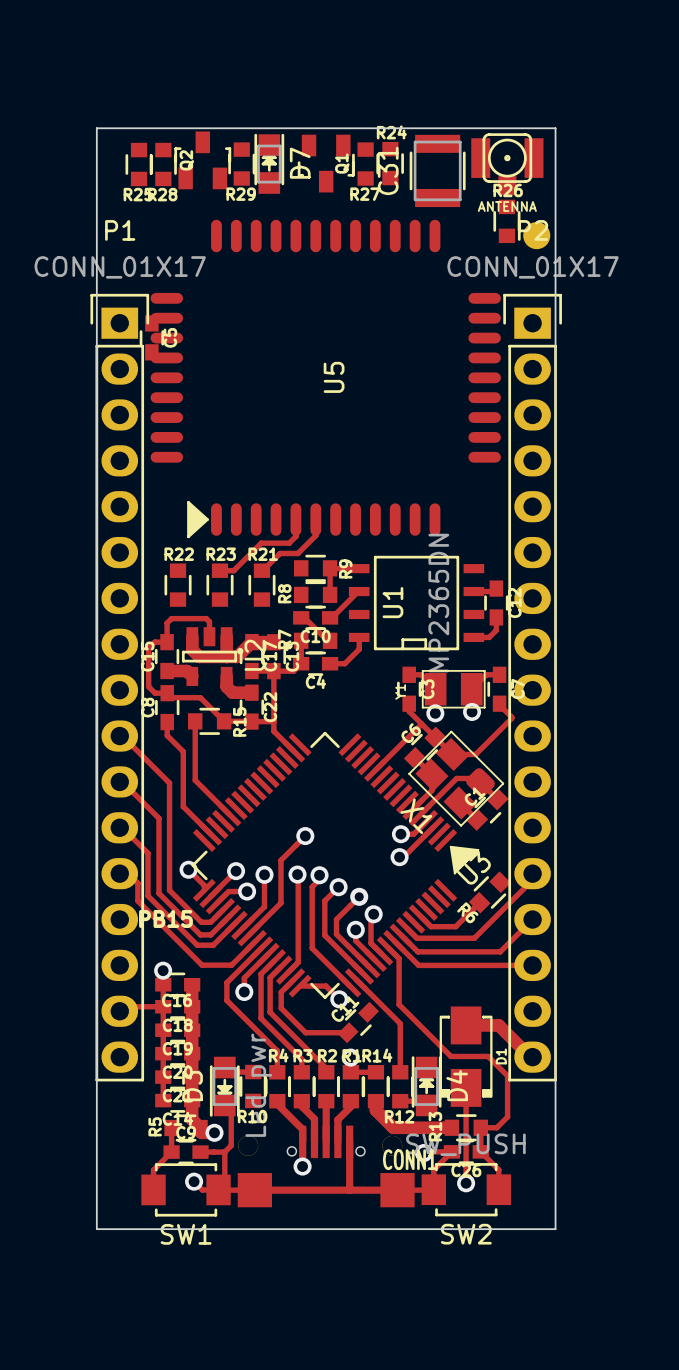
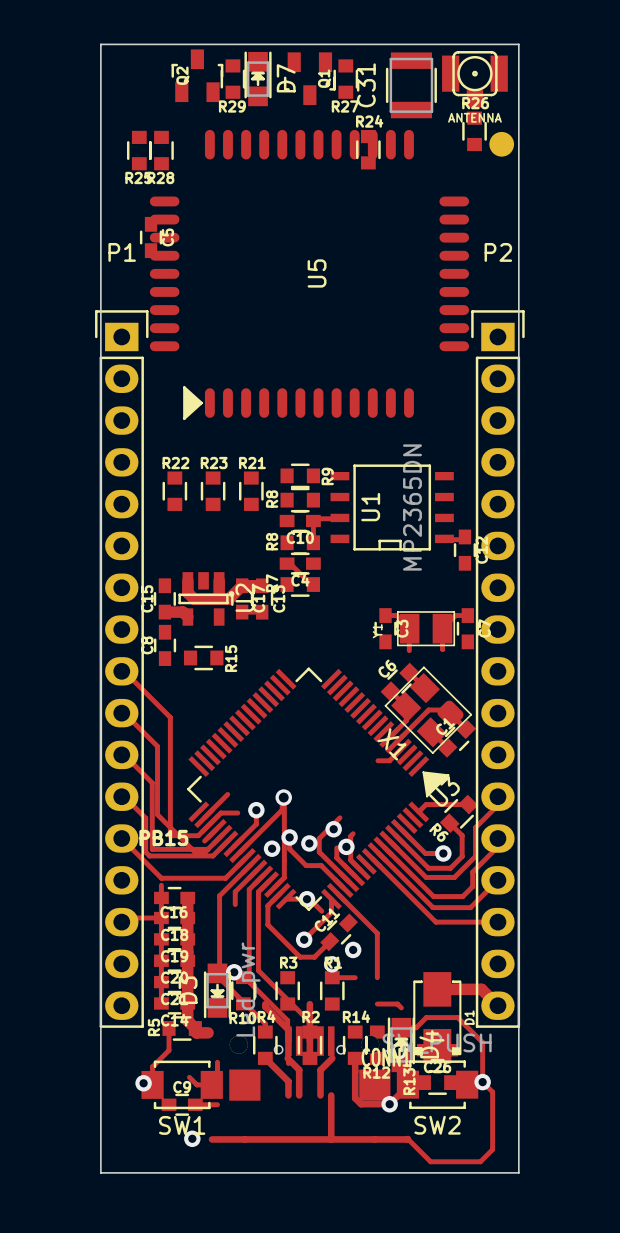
board edge: (96, 128) (555, 128) -> (100, 117) (100, 44) (518, 44) (518, 117)
Q2 position: (202, 160) -> (197, 75)
D7 position: (269, 163) -> (258, 78)
Q1 position: (326, 163) -> (309, 78)
R29 position: (241, 164) -> (232, 79)
R27 position: (365, 164) -> (345, 79)
part position: (507, 164) -> (474, 79)
C31 position: (437, 170) -> (411, 85)
R26 position: (506, 221) -> (474, 131)
part position: (536, 235) -> (501, 144)
P1 value: CONN_01X17 (120, 267) -> none
P2 value: CONN_01X17 (533, 267) -> none
C5 position: (151, 337) -> (151, 237)
U5 position: (325, 378) -> (309, 274)
track: (295, 519) (295, 536) (289, 543) (261, 543) (233, 570) (220, 570) -> none
track: (315, 519) (315, 535) (297, 553) (280, 553) (261, 570) -> none
R8: none -> (300, 500)
R9 position: (315, 568) -> (300, 475)
C10: none -> (300, 521)
R22 position: (178, 585) -> (174, 491)
R23 position: (220, 585) -> (213, 491)
R21 position: (261, 585) -> (251, 491)
track: (359, 591) (330, 617) -> none
U1 position: (416, 603) -> (392, 507)
track: (496, 617) (496, 630) (489, 637) (473, 637) -> none
track: (209, 636) (209, 621) (206, 618) (171, 618) (167, 623) (167, 642) (154, 642) (148, 648) (148, 686) (155, 693) (167, 693) (171, 697) (200, 697) (224, 721) (251, 721) -> none
C10 name: C10 (315, 636) -> C4 (300, 580)
track: (359, 637) (359, 649) (344, 663) (330, 663) -> none
track: (301, 640) (301, 663) (293, 671) (273, 671) (273, 731) (293, 751) -> none
C4: (315, 663) -> none
track: (226, 676) (226, 686) (232, 692) (251, 692) -> none
P1 position: (119, 687) -> (121, 669)
P2 position: (532, 687) -> (497, 669)
track: (499, 703) (511, 718) (475, 754) (452, 754) -> none
C22: (251, 707) -> none
via: (472, 711) -> none
via: (435, 713) -> none
track: (195, 721) (195, 780) (229, 814) -> none
track: (251, 721) (273, 721) -> none
track: (167, 722) (167, 735) (183, 751) (183, 806) (210, 834) -> none
track: (421, 724) (375, 770) -> none
track: (169, 783) (169, 890) (201, 922) (210, 922) -> (167, 714) (170, 717) (170, 835) (198, 835) (210, 823)
track: (432, 827) (403, 857) (399, 857) -> none
via: (400, 834) -> none
track: (305, 836) (281, 860) (281, 903) -> (282, 803) (282, 809) (268, 823)
via: (305, 836) -> none
track: (147, 853) (147, 895) (197, 945) (213, 945) (219, 938) -> (147, 778) (152, 782) (152, 849) (207, 849)
via: (399, 857) -> none
track: (188, 869) (204, 885) (204, 890) -> none
via: (188, 869) -> none
via: (236, 871) -> none
track: (122, 873) (128, 873) (137, 883) (137, 900) (202, 965) (231, 965) (233, 963) -> (124, 796) (145, 818) (145, 852) (149, 855) (212, 855)
track: (264, 874) (264, 906) -> (256, 810) (256, 824) (253, 826)
via position: (264, 874) -> (256, 810)
track: (319, 875) (319, 879) (312, 886) (312, 948) (349, 986) -> (304, 939) (331, 912) (331, 899)
via: (319, 875) -> none
track: (532, 880) (474, 938) (417, 938) -> (497, 802) (497, 805) (475, 827) (475, 856) (454, 877) (426, 877) (389, 840)
track: none -> (468, 804) (426, 804) (418, 811)
track: (338, 887) (324, 900) (324, 935) (338, 949) -> (289, 837) (289, 849) (306, 865) (321, 865)
via: (338, 887) -> none
via: (247, 891) -> none
via position: (359, 896) -> (333, 829)
track: (479, 902) (455, 926) (431, 926) -> (449, 823) (462, 835) (462, 856) (450, 868) (428, 868) (405, 845)
track: none -> (401, 829) (425, 853) (443, 853)
via: (373, 914) -> none
via: none -> (289, 837)
track: none -> (121, 838) (161, 878) (225, 878)
track: (532, 919) (500, 951) (417, 951) -> (497, 838) (497, 846) (472, 872) (472, 886) (462, 896) (433, 896) (392, 855)
via: none -> (309, 843)
via: none -> (346, 846)
via: (355, 929) -> none
via: none -> (272, 848)
via: none -> (443, 853)
track: (388, 947) (399, 958) (399, 1004) (450, 1056) (488, 1056) (507, 1075) (507, 1117) (496, 1127) (480, 1127) (480, 1151) (498, 1169) (498, 1189) -> none
track: (418, 965) (532, 965) -> (393, 867) (433, 907) (470, 907) (497, 880)
track: none -> (394, 880) (435, 922) (497, 922)
via: (163, 970) -> none
track: (261, 974) (261, 1018) (301, 1059) (301, 1072) -> (250, 888) (249, 982) (287, 1020) (287, 1032)
track: (270, 977) (270, 1012) (326, 1068) (326, 1072) -> (258, 891) (258, 970) (309, 1022) (309, 1032)
track: (226, 982) (226, 1000) (277, 1050) (277, 1072) -> (219, 895) (219, 978) (265, 1023) (265, 1032)
via: none -> (307, 899)
via: (244, 992) -> none
track: (281, 992) (281, 1008) (305, 1032) (348, 1032) -> (268, 904) (267, 924) (300, 957) (314, 957) (329, 941)
via: (339, 999) -> none
track: (466, 1025) (498, 1025) (532, 1057) -> none
via: none -> (304, 939)
via: none -> (353, 949)
D1 position: (466, 1056) -> (437, 1017)
via: none -> (234, 972)
track: none -> (437, 989) (481, 989) (497, 1005)
R4 position: (277, 1086) -> (265, 1045)
R2 position: (326, 1086) -> (309, 1045)
R14 position: (375, 1086) -> (355, 1045)
R12 position: (400, 1086) -> (377, 1045)
D4 position: (426, 1086) -> (401, 1044)
track: (466, 1087) (466, 1183) -> none
track: (301, 1101) (301, 1106) (314, 1119) (314, 1141) -> none
track: (350, 1101) (350, 1106) (337, 1119) (337, 1141) -> none
track: (375, 1101) (375, 1110) (393, 1127) (451, 1127) -> none
track: (224, 1105) (231, 1111) (231, 1145) (224, 1152) -> none
track: none -> (401, 1027) (416, 1027) (426, 1017) (457, 1017) (482, 1042) (482, 1082) (492, 1092) (492, 1149) (480, 1161) (430, 1161) (407, 1139) (212, 1139)
R13 position: (466, 1127) -> (437, 1082)
via: (214, 1132) -> none
track: (349, 1141) (349, 1190) -> none
C9 position: (186, 1152) -> (182, 1104)
track: (200, 1152) (224, 1152) -> (195, 1104) (217, 1104)
track: (224, 1152) (224, 1165) -> none
track: (423, 1153) (451, 1151) (433, 1169) (433, 1190) (218, 1190) -> none
track: none -> (265, 1058) (288, 1081) (288, 1095)
track: none -> (287, 1058) (299, 1069) (299, 1095)
track: none -> (332, 1058) (320, 1070) (320, 1095)
track: none -> (355, 1058) (355, 1098) (361, 1104) (389, 1104) (411, 1082) (424, 1082)
via: (302, 1166) -> none
via: (194, 1181) -> none
via: (466, 1183) -> none
via: none -> (482, 1082)
via: none -> (143, 1083)
track: none -> (331, 1095) (330, 1139)
via: none -> (389, 1104)
board edge: (96, 1229) (555, 1229) -> (100, 1120) (100, 1172) (518, 1172) (518, 1120)
via: none -> (192, 1138)

